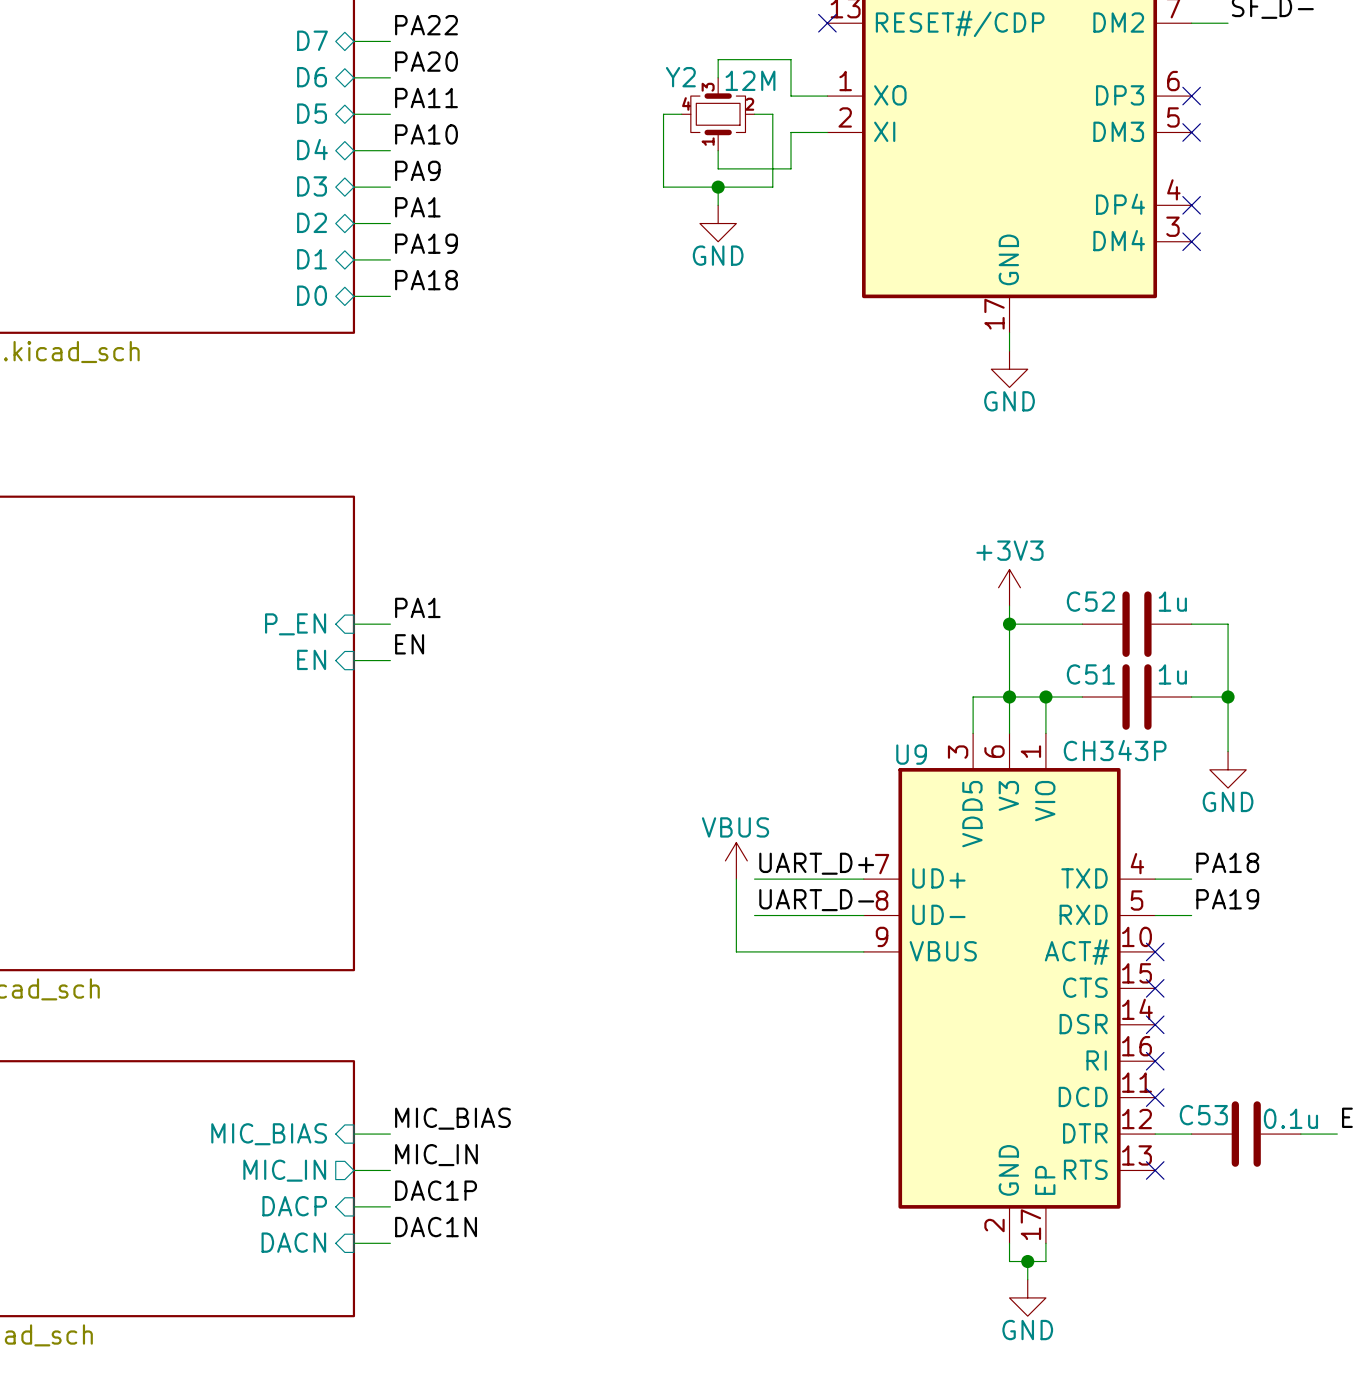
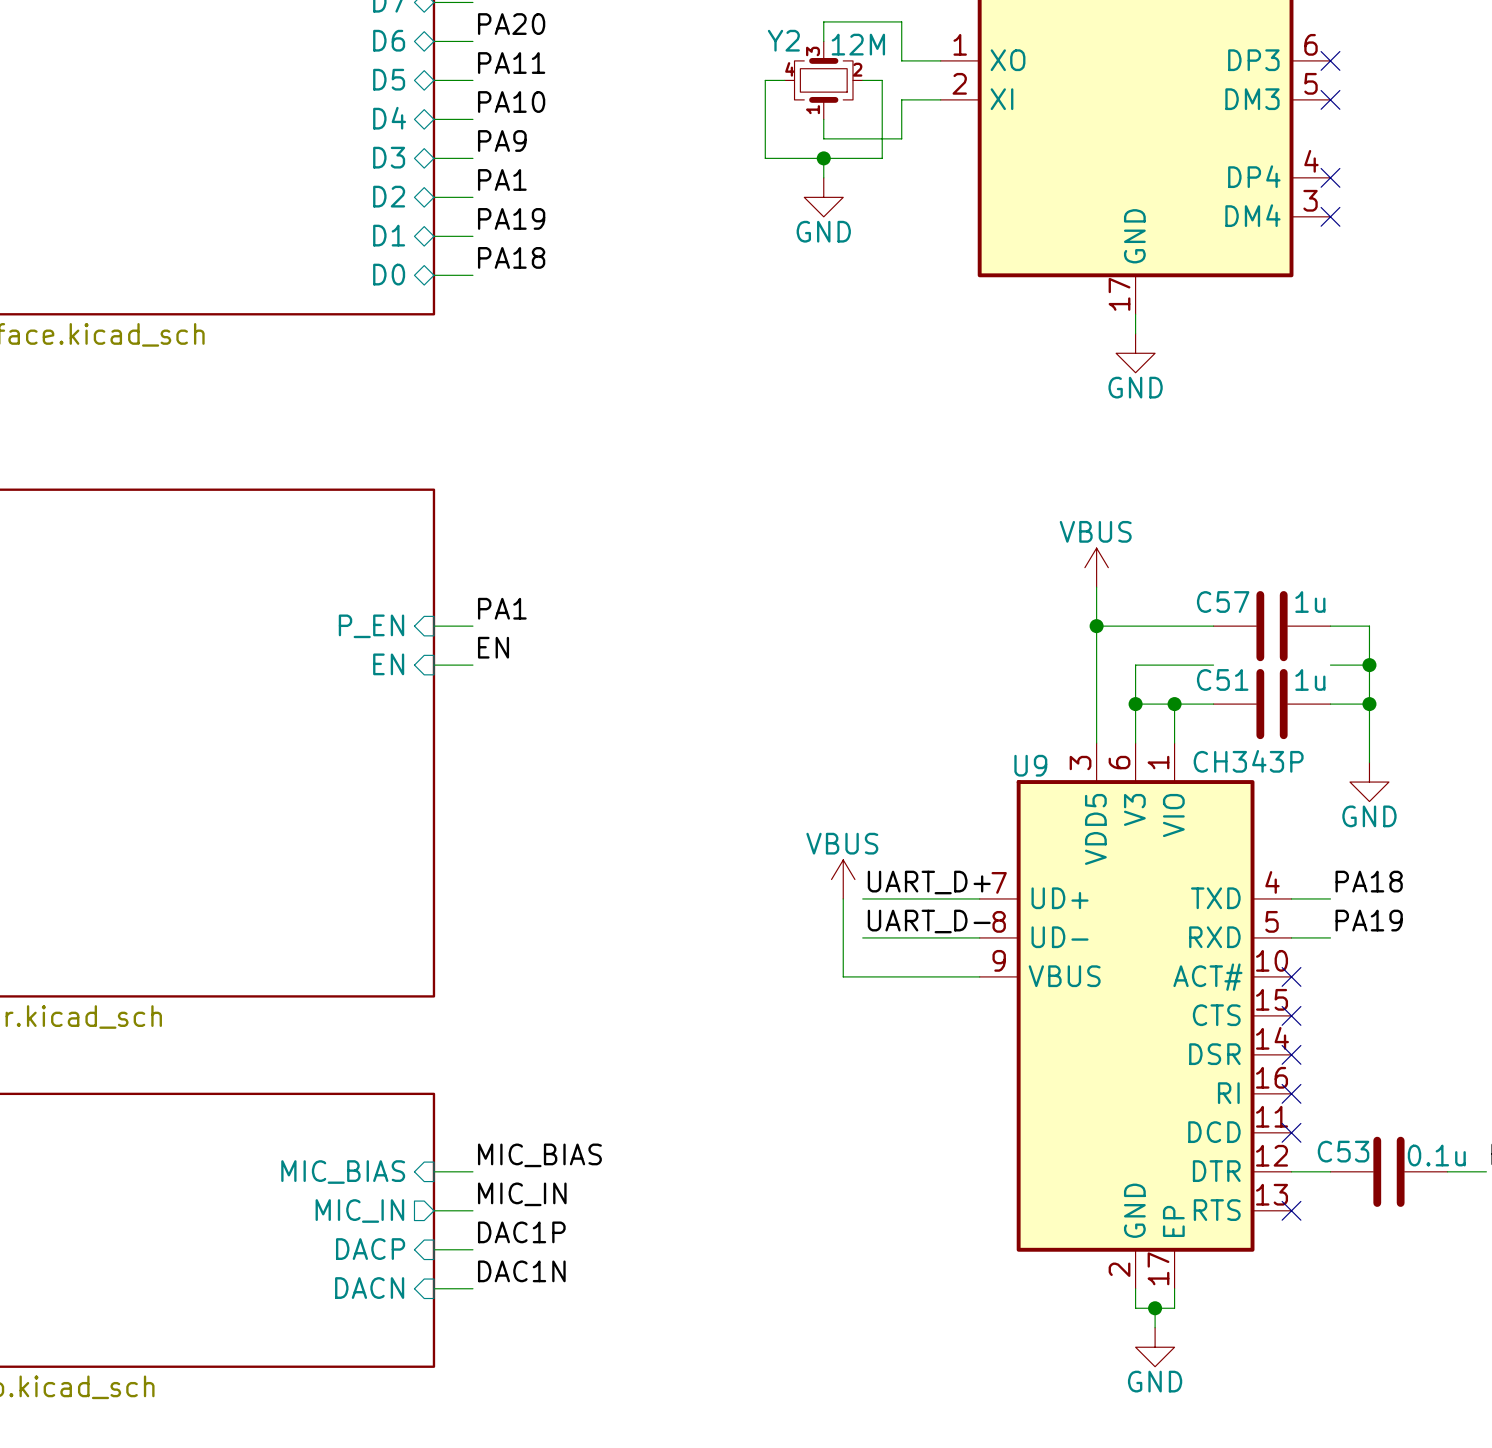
power symbol: none -> VBUS (1096, 567)
power symbol: +3V3 (1009, 587) -> none
C52 name: C52 (1090, 601) -> C57 (1223, 602)
wire: (1009, 605) (1009, 660) -> (1213, 665) (1135, 665)
wire: none -> (1096, 626) (1135, 626)
junction position: (1009, 624) -> (1096, 626)
wire: none -> (1330, 665) (1369, 665)
junction: none -> (1369, 665)
wire: (973, 697) (1009, 697) -> (1096, 704) (1096, 587)

